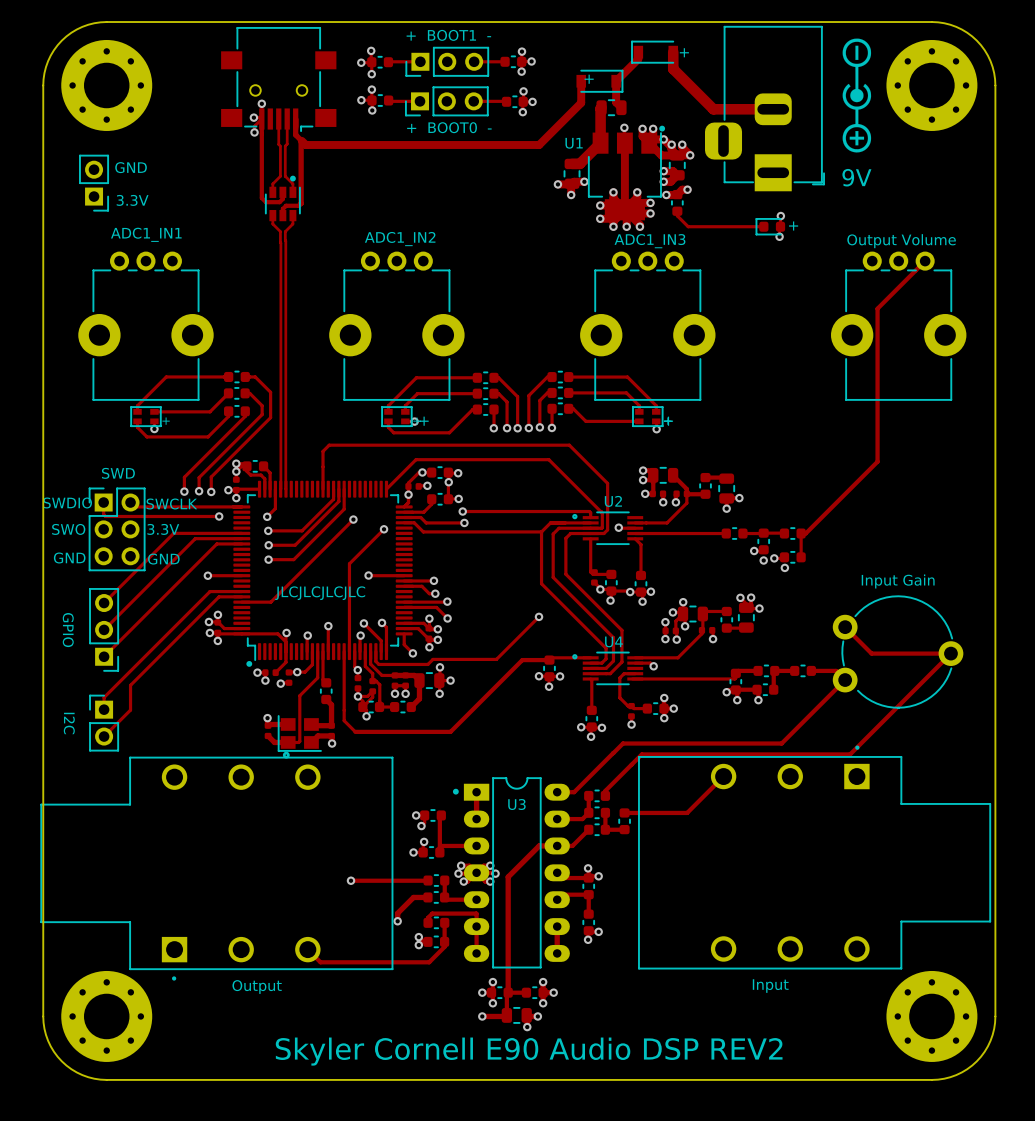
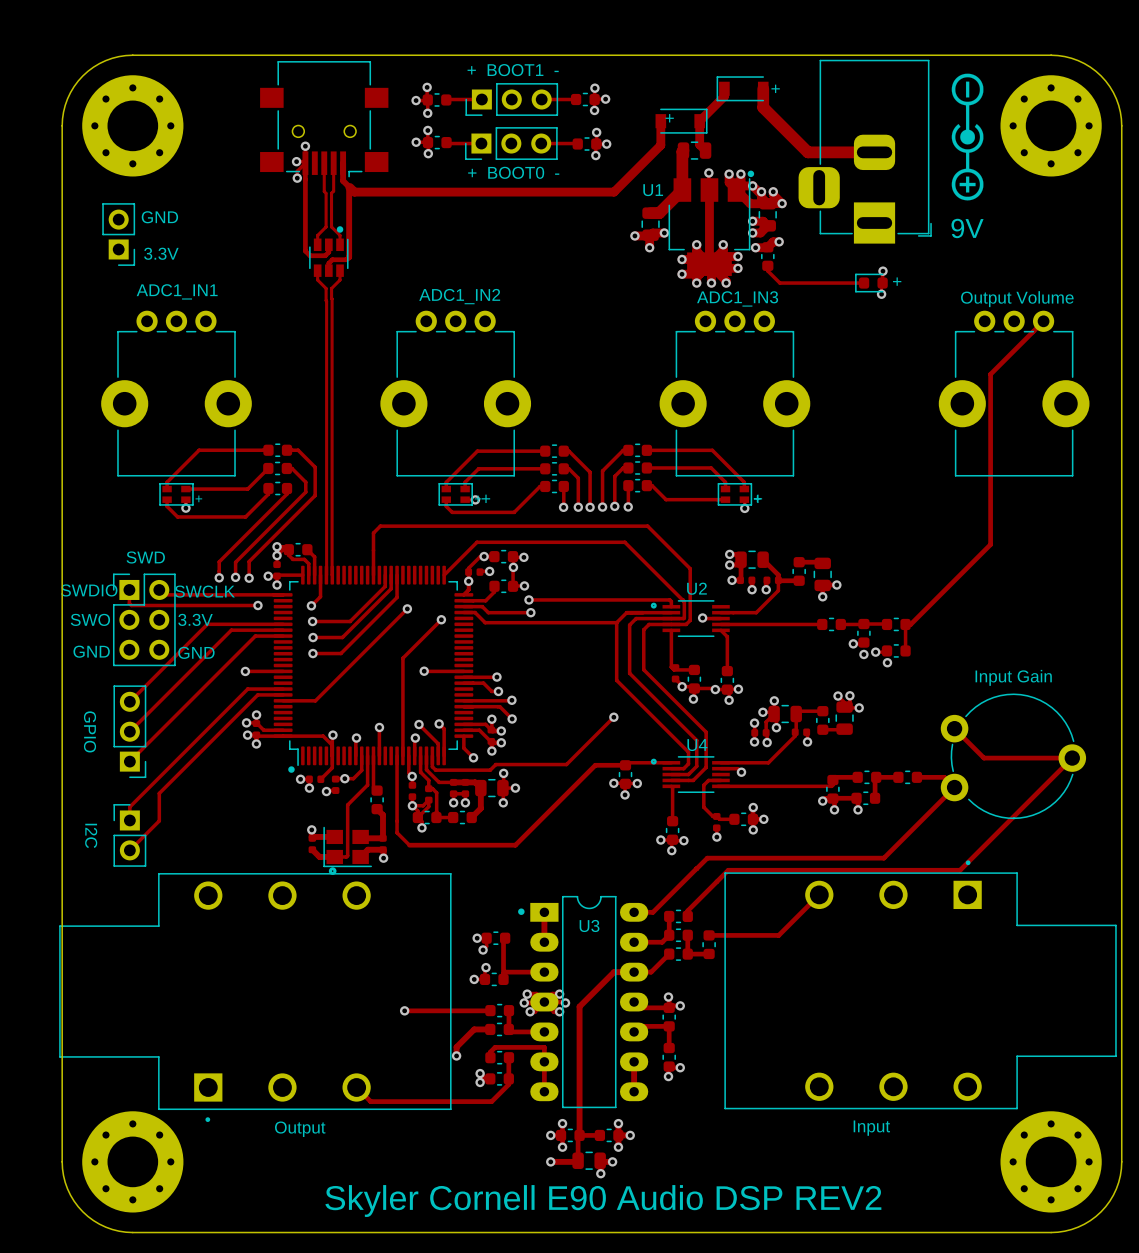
text: JLCJLCJLCJLC (320, 593) -> none

